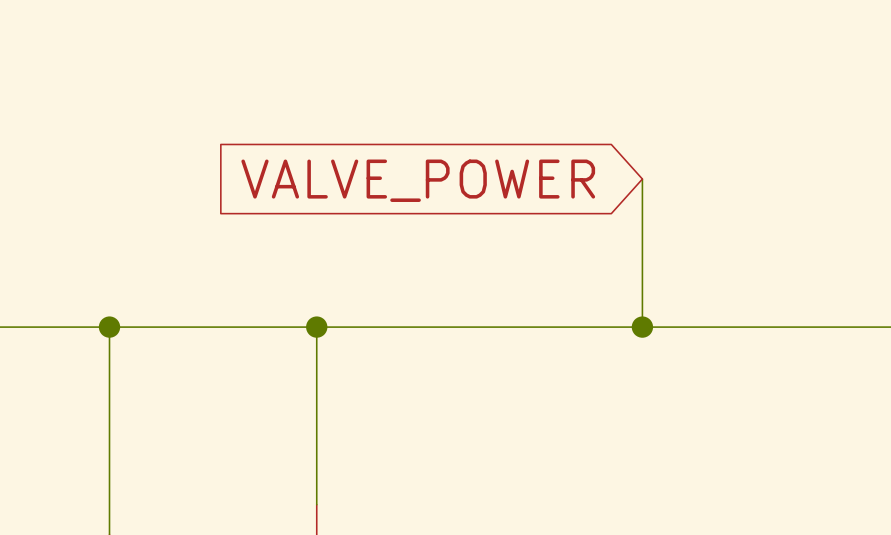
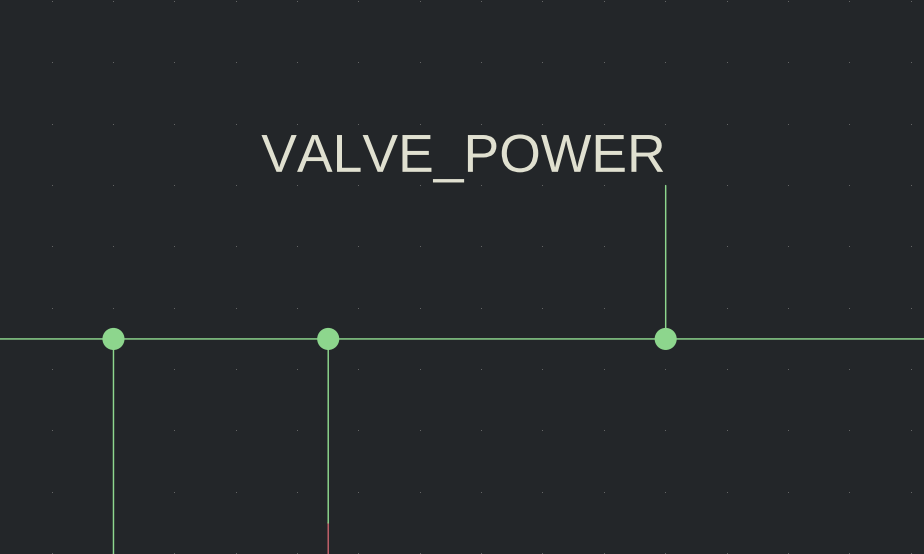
label: none -> VALVE_POWER (462, 158)
global label: VALVE_POWER (418, 180) -> none

